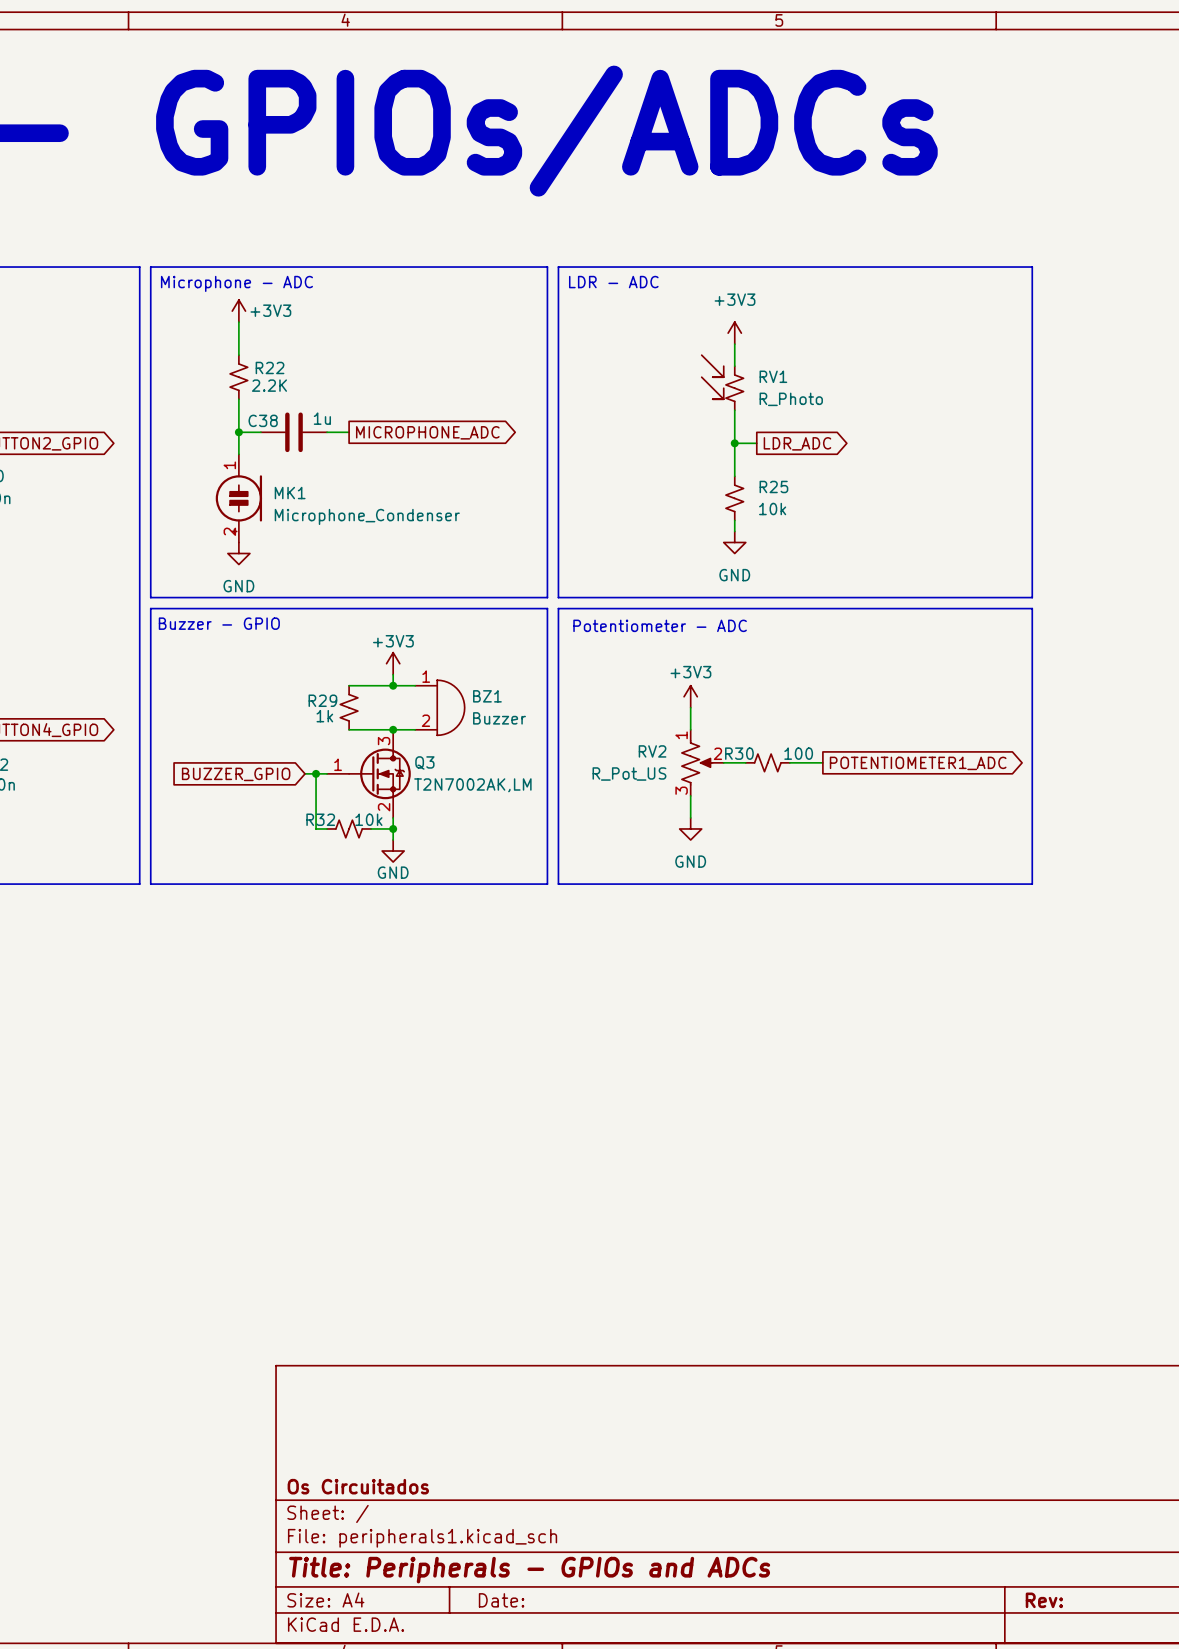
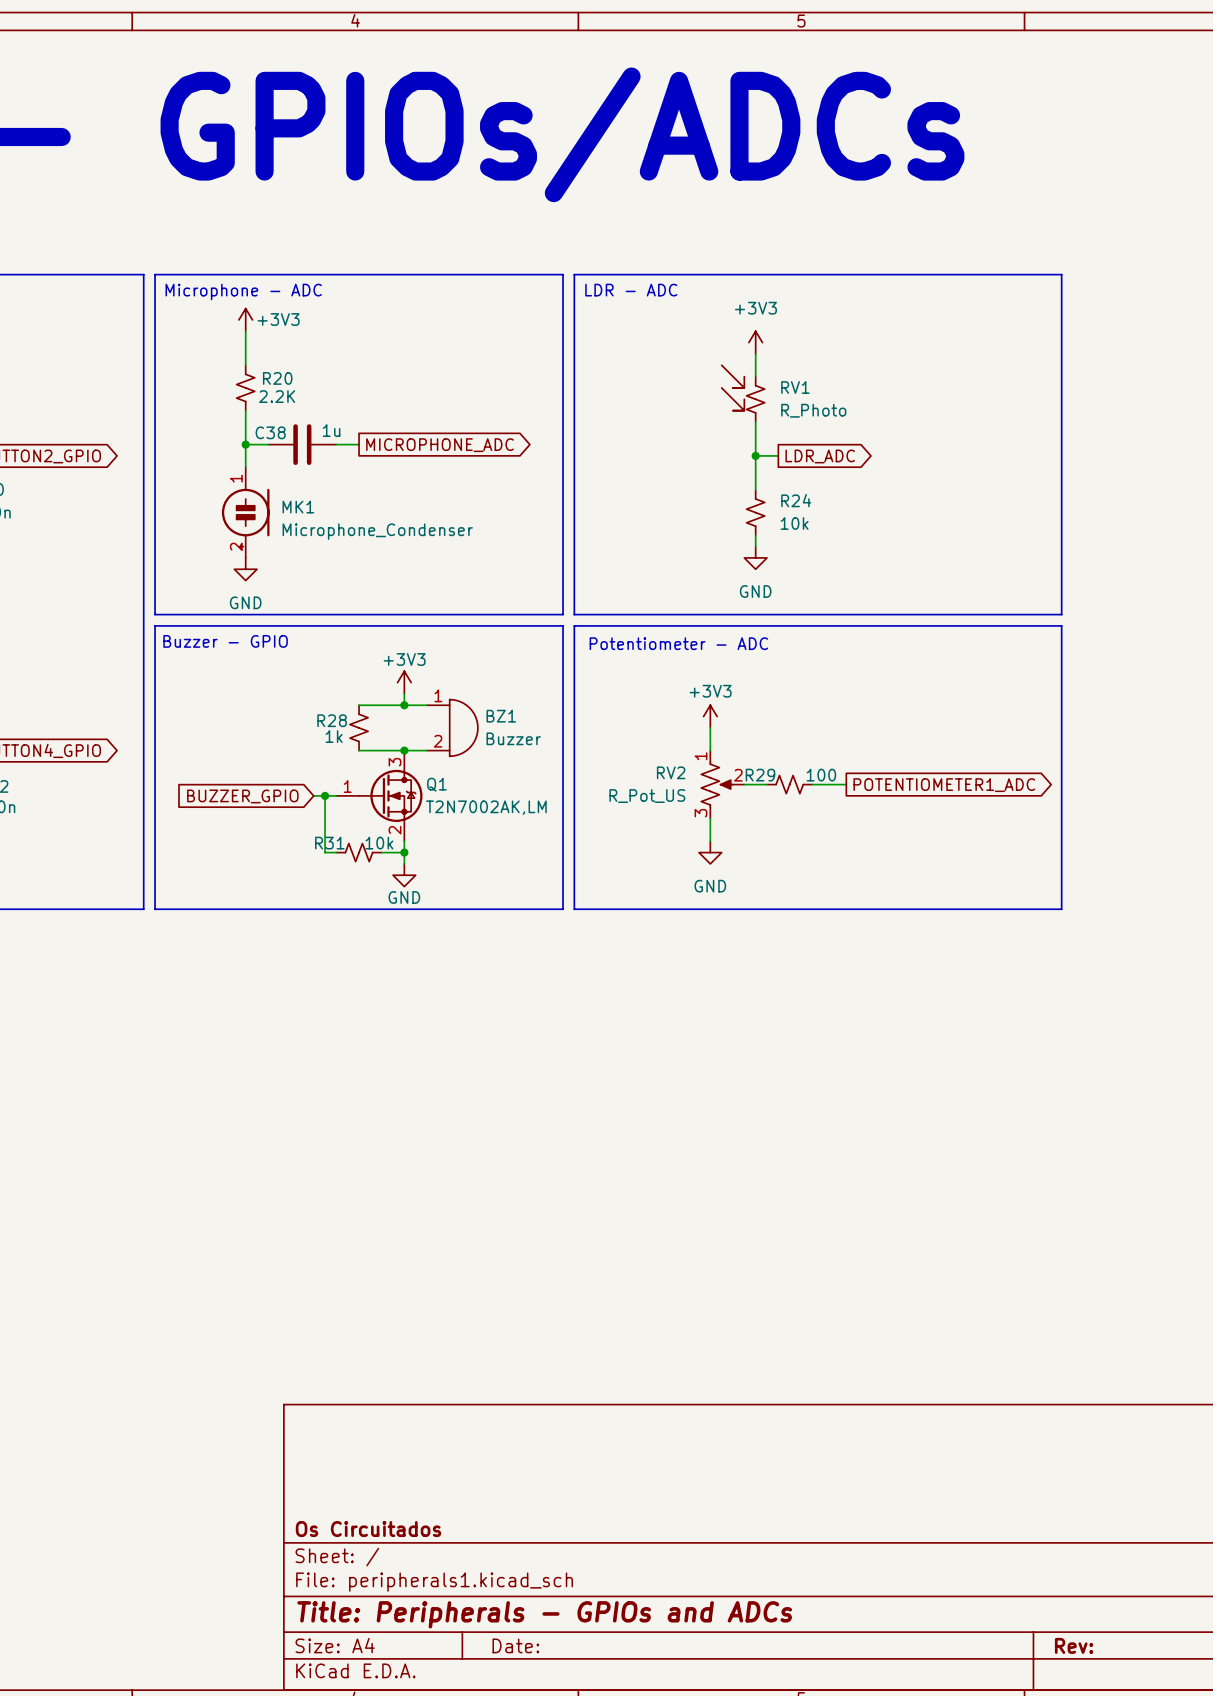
R22 name: R22 (270, 367) -> R20 (277, 378)
R25 name: R25 (773, 486) -> R24 (796, 500)
R29 name: R29 (322, 700) -> R28 (332, 720)
R30 name: R30 (739, 753) -> R29 (760, 775)
Q3 name: Q3 (424, 762) -> Q1 (436, 784)
R32 name: R32 (320, 819) -> R31 (329, 843)

